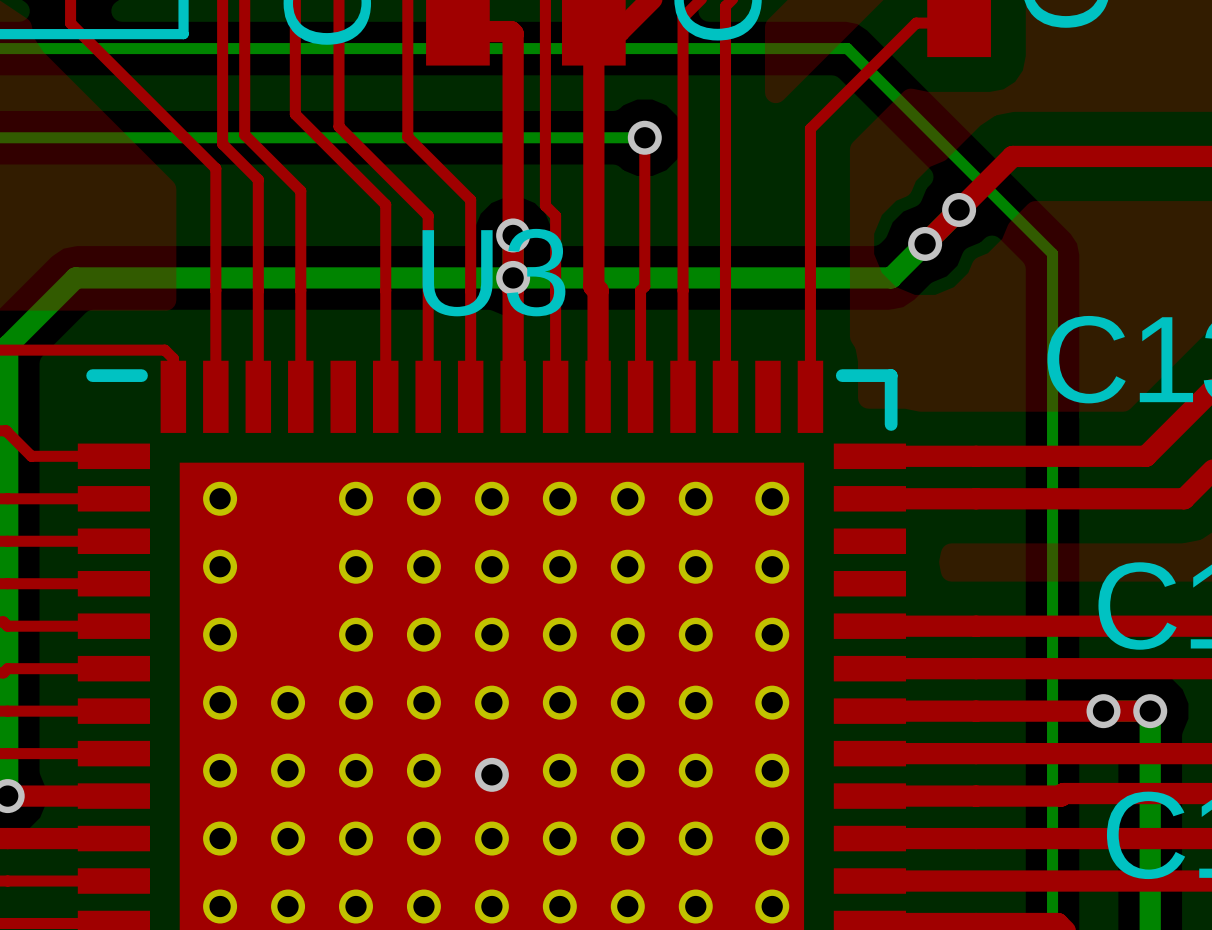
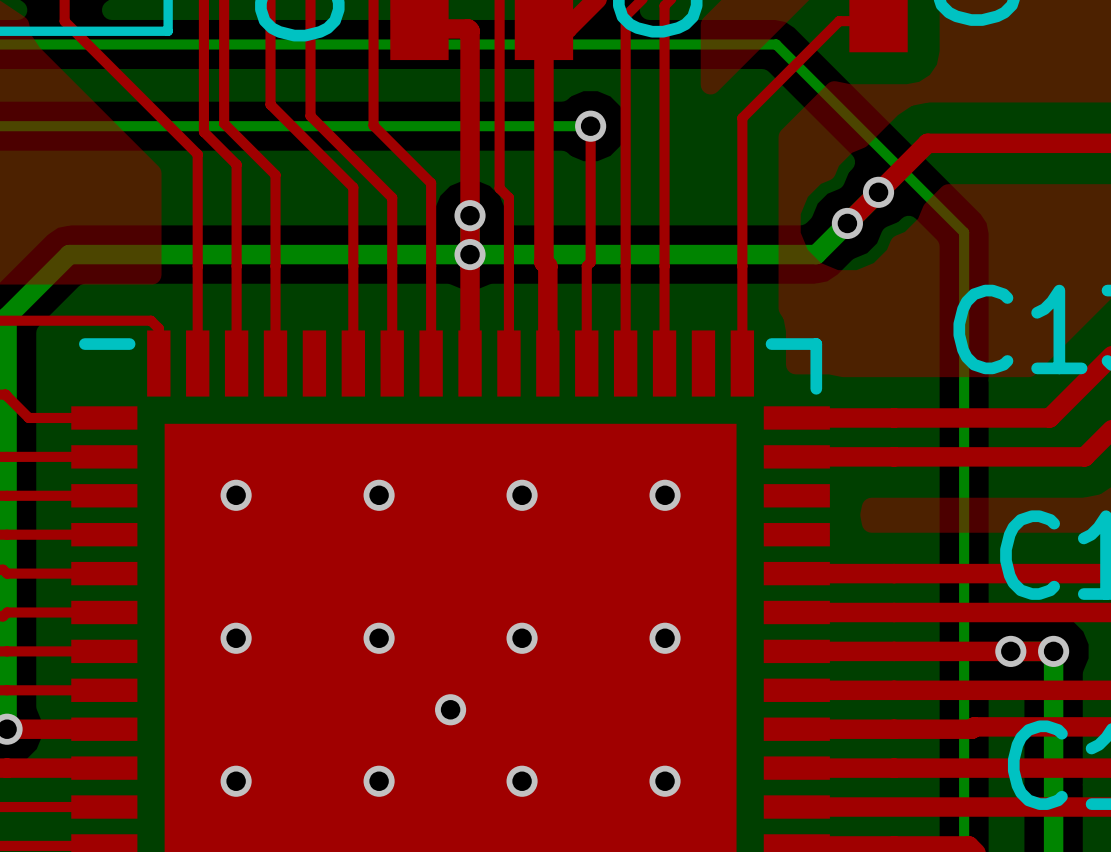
U3 name: U3 (493, 272) -> none
part: (220, 498) -> none
part: (355, 498) -> none
part: (423, 498) -> none
part: (491, 498) -> none
part: (559, 498) -> none
part: (627, 498) -> none
part: (695, 498) -> none
part: (772, 498) -> none
via: none -> (236, 495)
via: none -> (379, 495)
via: none -> (522, 495)
via: none -> (665, 495)
part: (220, 566) -> none
part: (355, 566) -> none
part: (423, 566) -> none
part: (491, 566) -> none
part: (559, 566) -> none
part: (627, 566) -> none
part: (695, 566) -> none
part: (772, 566) -> none
part: (220, 634) -> none
part: (355, 634) -> none
part: (423, 634) -> none
part: (491, 634) -> none
part: (559, 634) -> none
part: (627, 634) -> none
part: (695, 634) -> none
part: (772, 634) -> none
via: none -> (236, 638)
via: none -> (379, 638)
via: none -> (522, 638)
via: none -> (665, 638)
part: (220, 702) -> none
part: (288, 702) -> none
part: (355, 702) -> none
part: (423, 702) -> none
part: (491, 702) -> none
part: (559, 702) -> none
part: (627, 702) -> none
part: (695, 702) -> none
part: (772, 702) -> none
part: (220, 770) -> none
part: (288, 770) -> none
part: (355, 770) -> none
part: (423, 770) -> none
part: (559, 770) -> none
part: (627, 770) -> none
part: (695, 770) -> none
part: (772, 770) -> none
part: (220, 838) -> none
part: (288, 838) -> none
part: (355, 838) -> none
part: (423, 838) -> none
part: (491, 838) -> none
part: (559, 838) -> none
part: (627, 838) -> none
part: (695, 838) -> none
part: (772, 838) -> none
via: none -> (236, 781)
via: none -> (379, 781)
via: none -> (522, 781)
via: none -> (665, 781)
part: (220, 906) -> none
part: (288, 906) -> none
part: (355, 906) -> none
part: (423, 906) -> none
part: (491, 906) -> none
part: (559, 906) -> none
part: (627, 906) -> none
part: (695, 906) -> none
part: (772, 906) -> none

